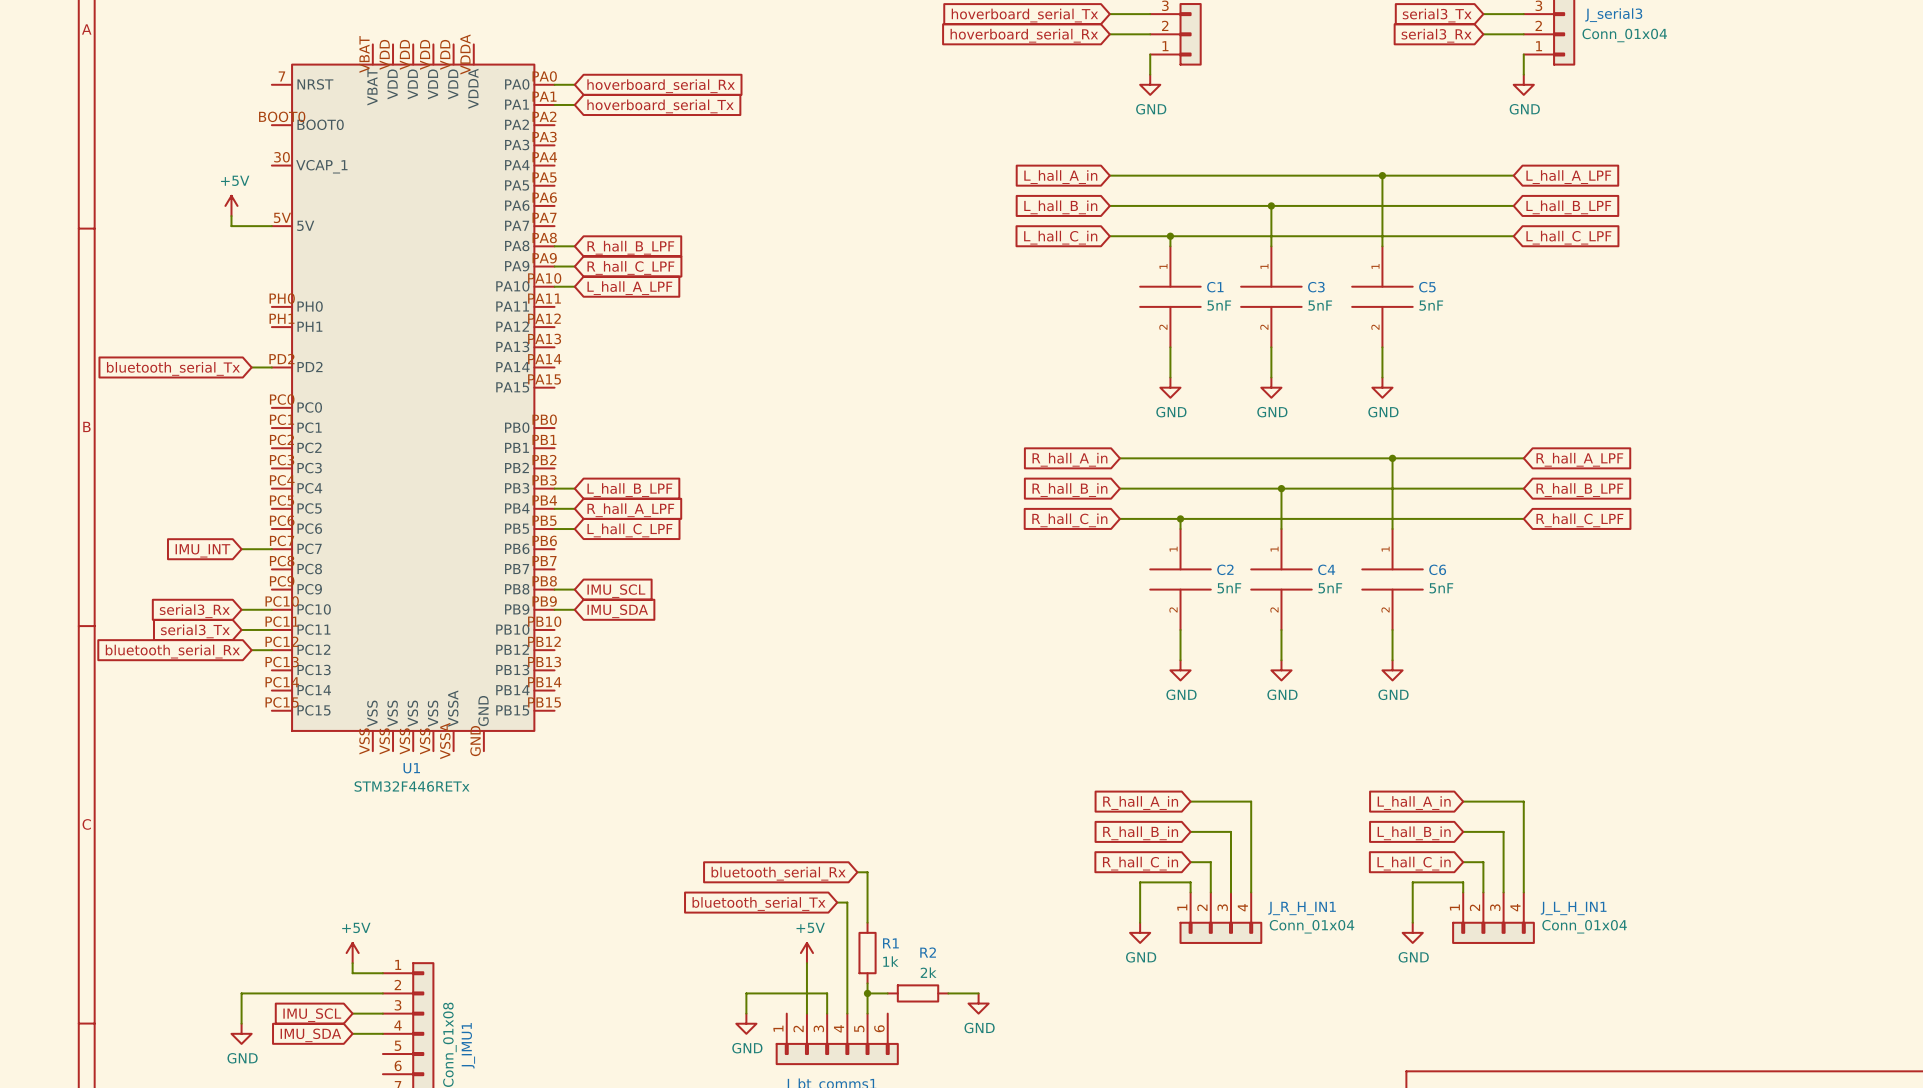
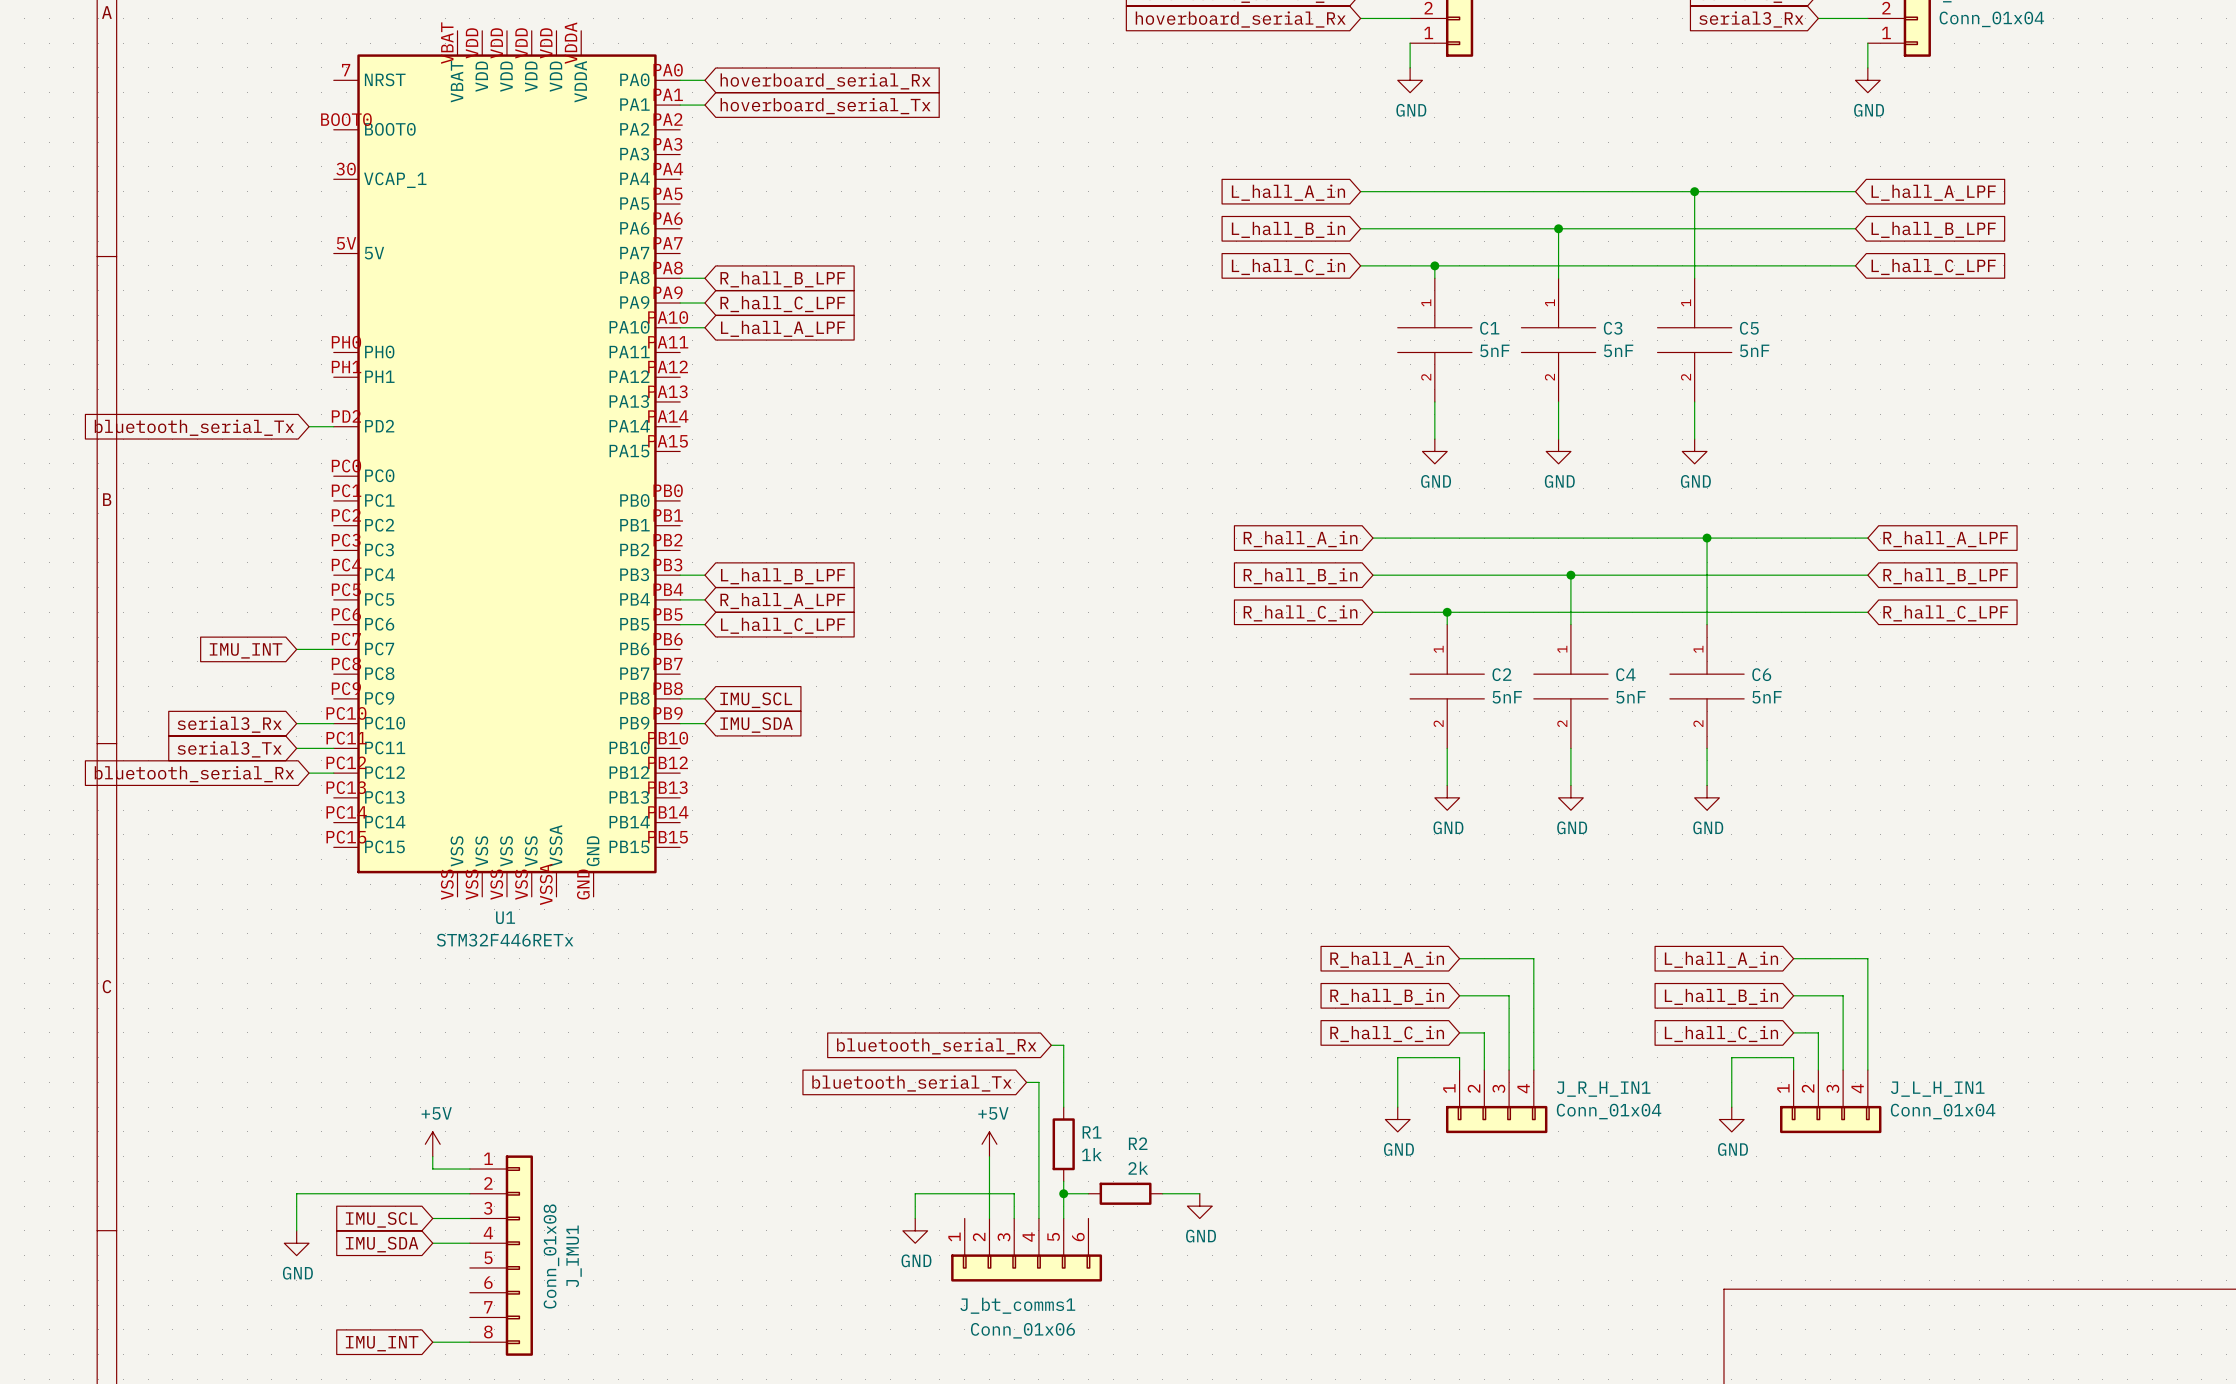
power symbol: +5V (231, 205) -> none
wire: (231, 216) (231, 226) (271, 226) -> none

